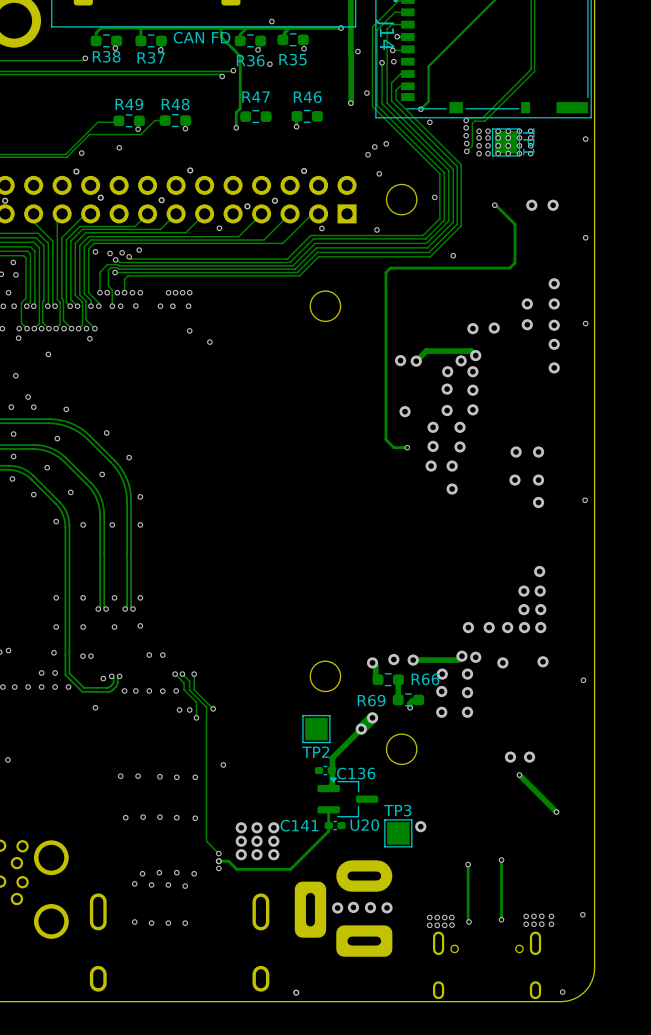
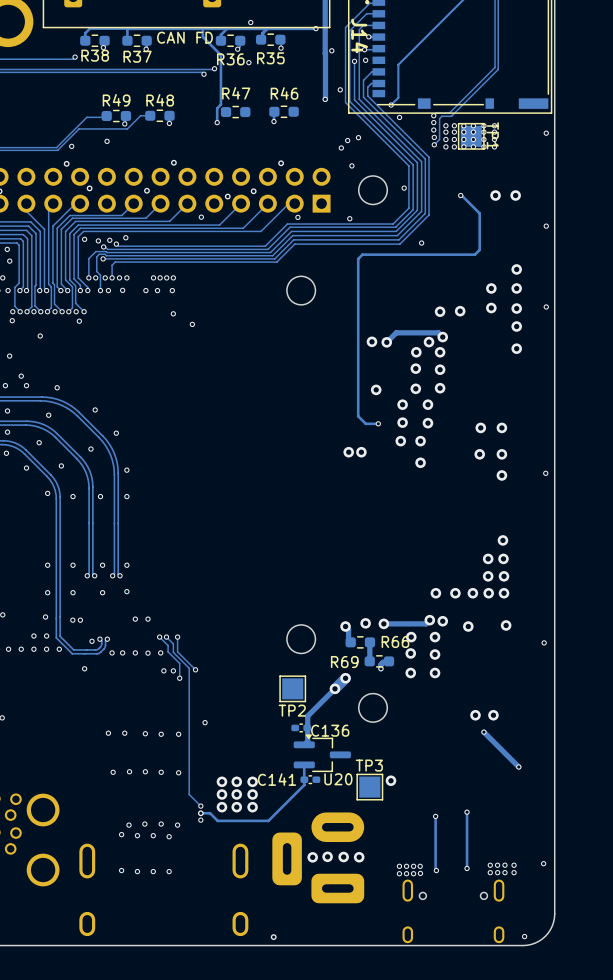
via: none -> (348, 452)
via: none -> (361, 452)

